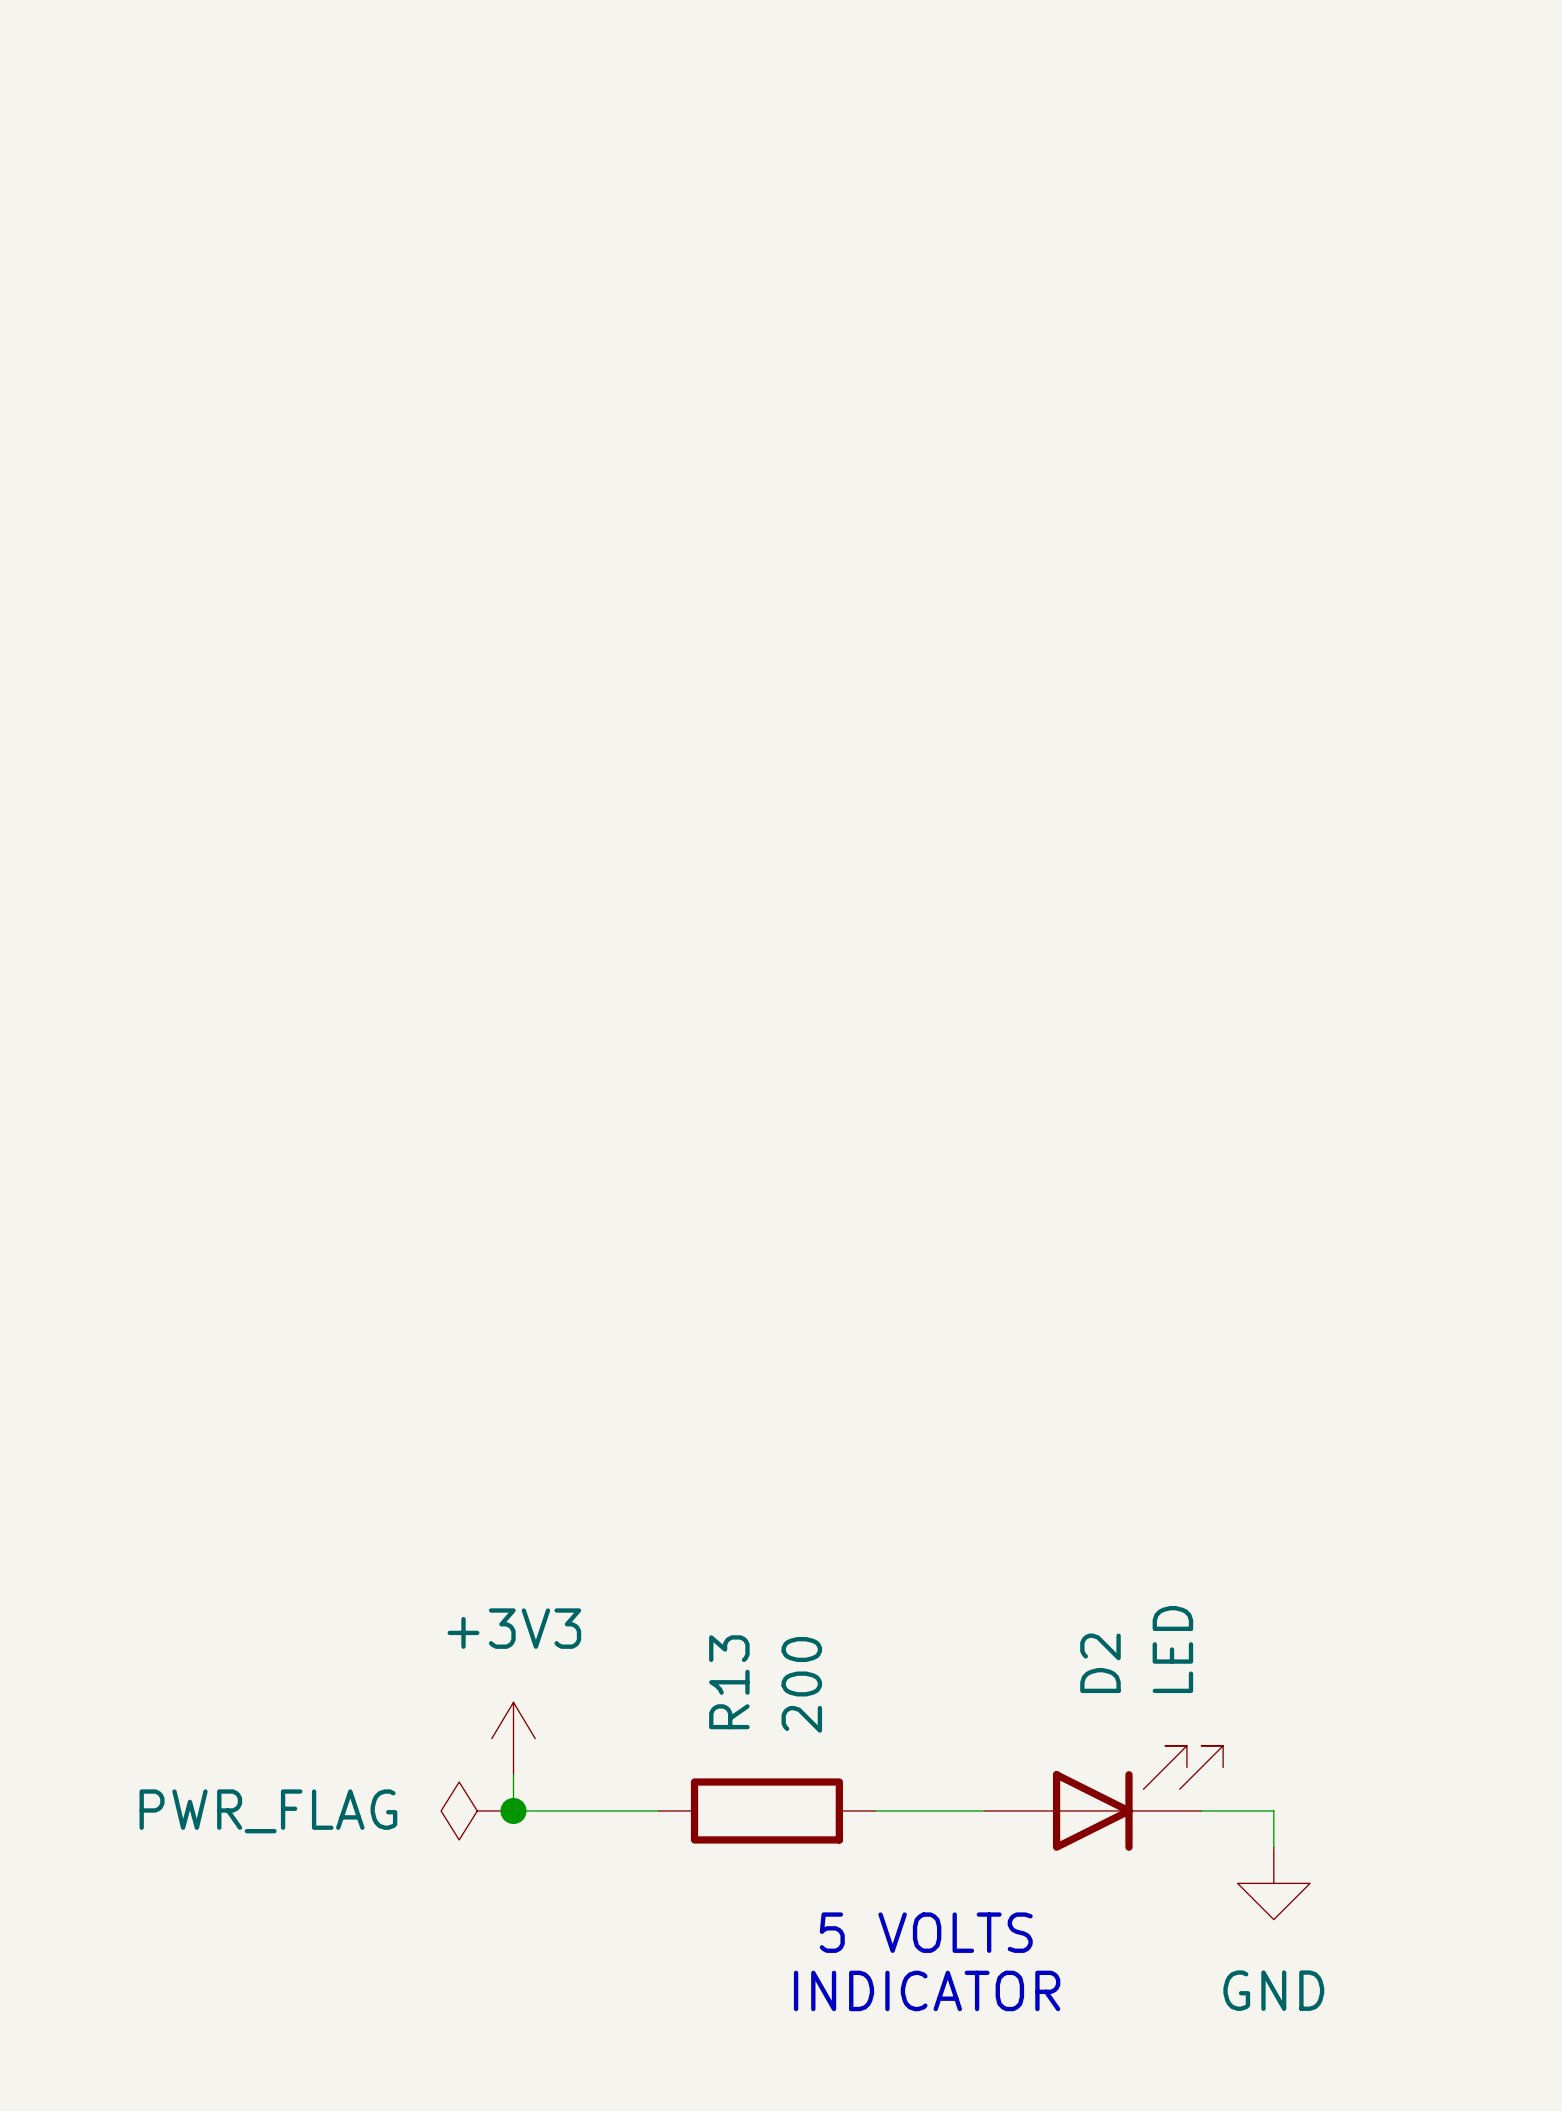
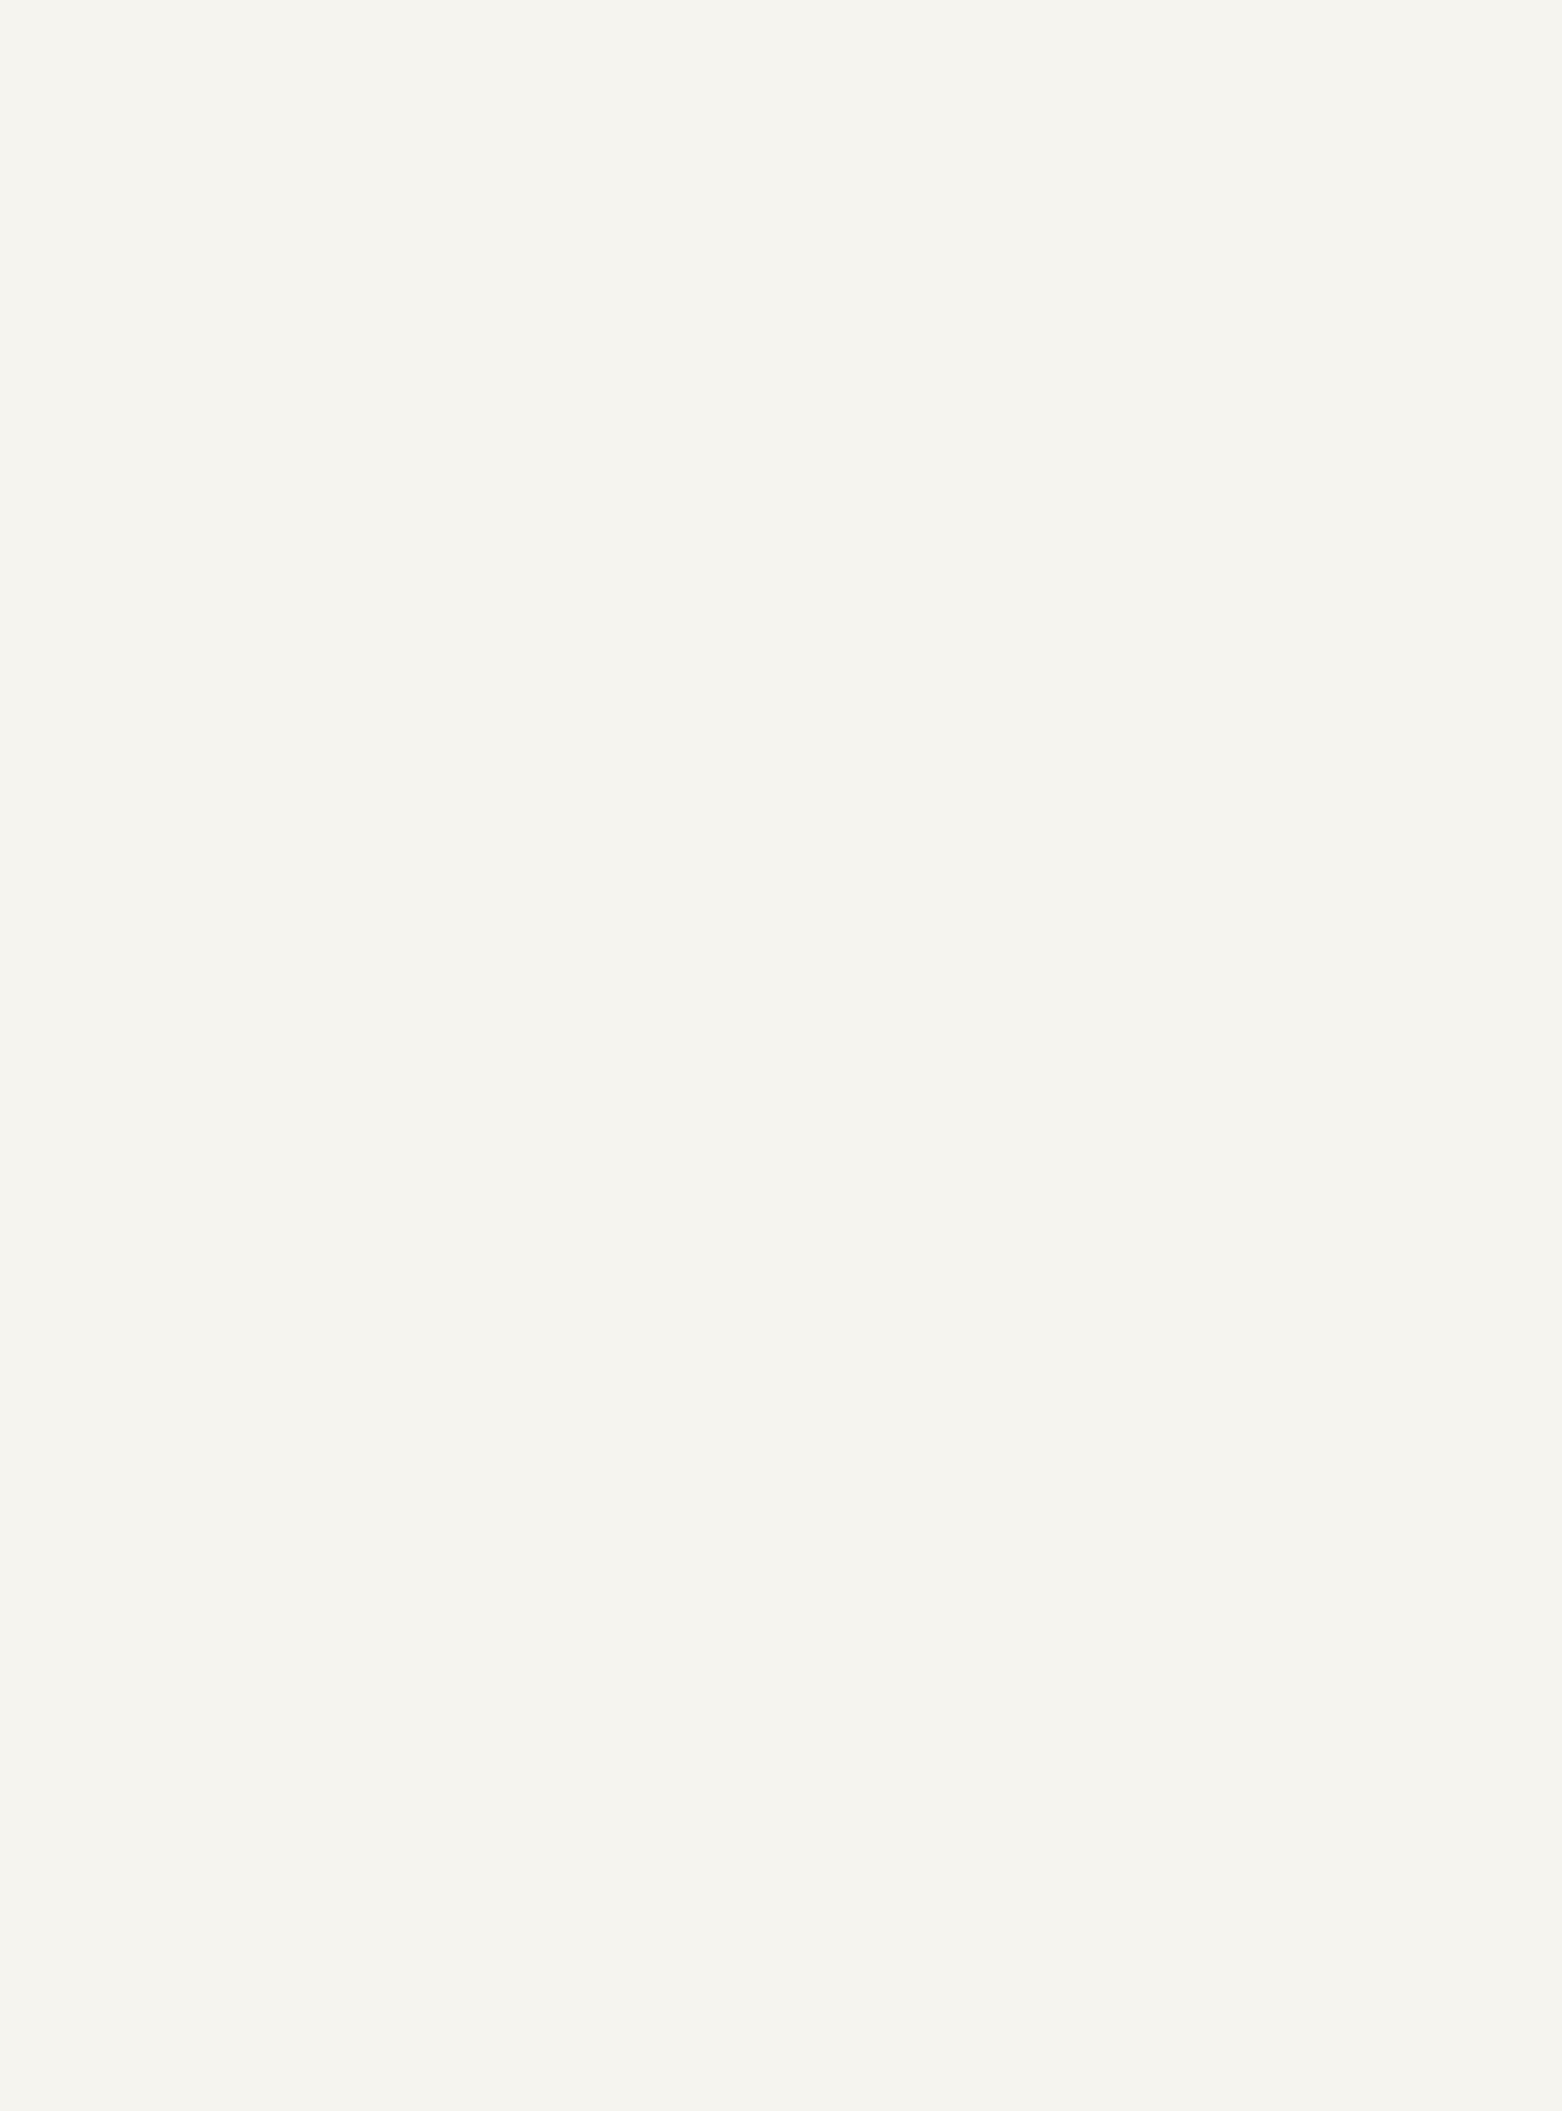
power symbol: +3V3 (513, 1738) -> none
wire: (513, 1774) (513, 1810) (658, 1810) -> none
D2: LED (1103, 1798) -> none
power symbol: PWR_FLAG (477, 1810) -> none
junction: (513, 1810) -> none
R13: 200 (766, 1810) -> none
wire: (875, 1810) (984, 1810) -> none
wire: (1201, 1810) (1273, 1810) (1273, 1847) -> none
power symbol: GND (1273, 1883) -> none
text: 5 VOLTS (926, 1932) -> none
text: INDICATOR (927, 1990) -> none

